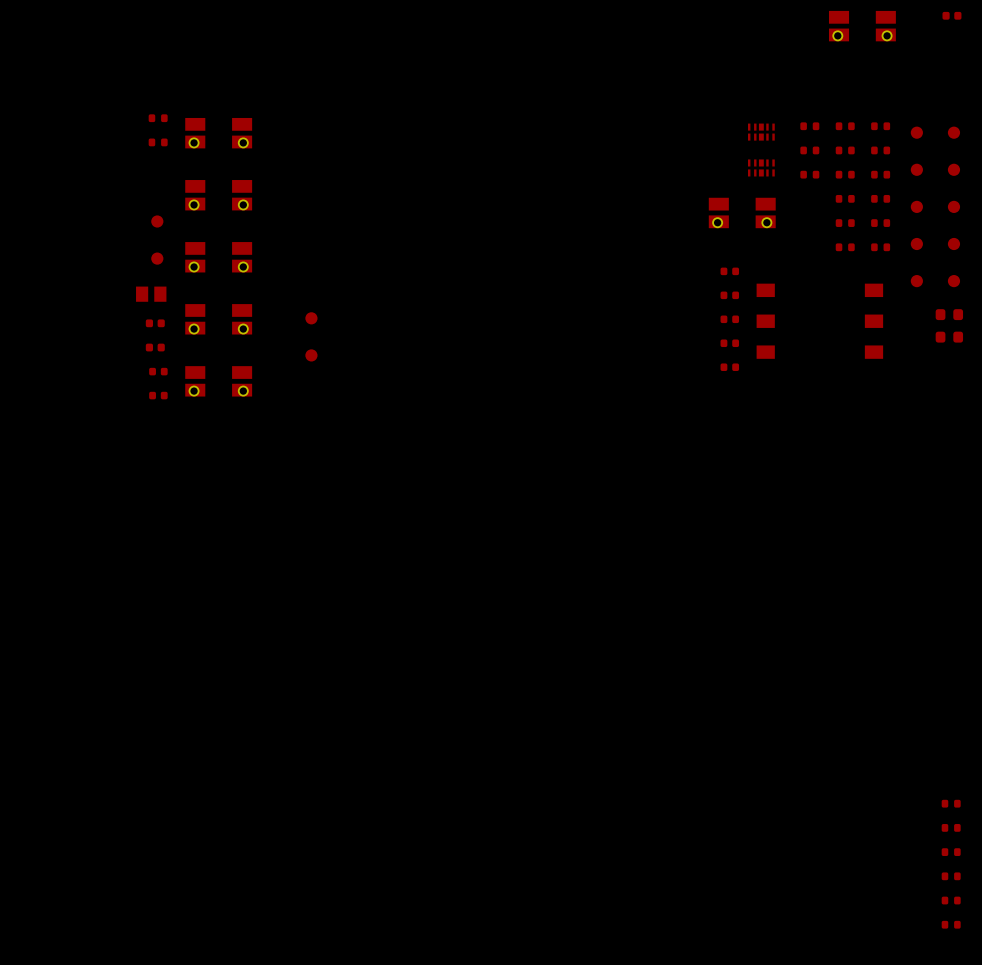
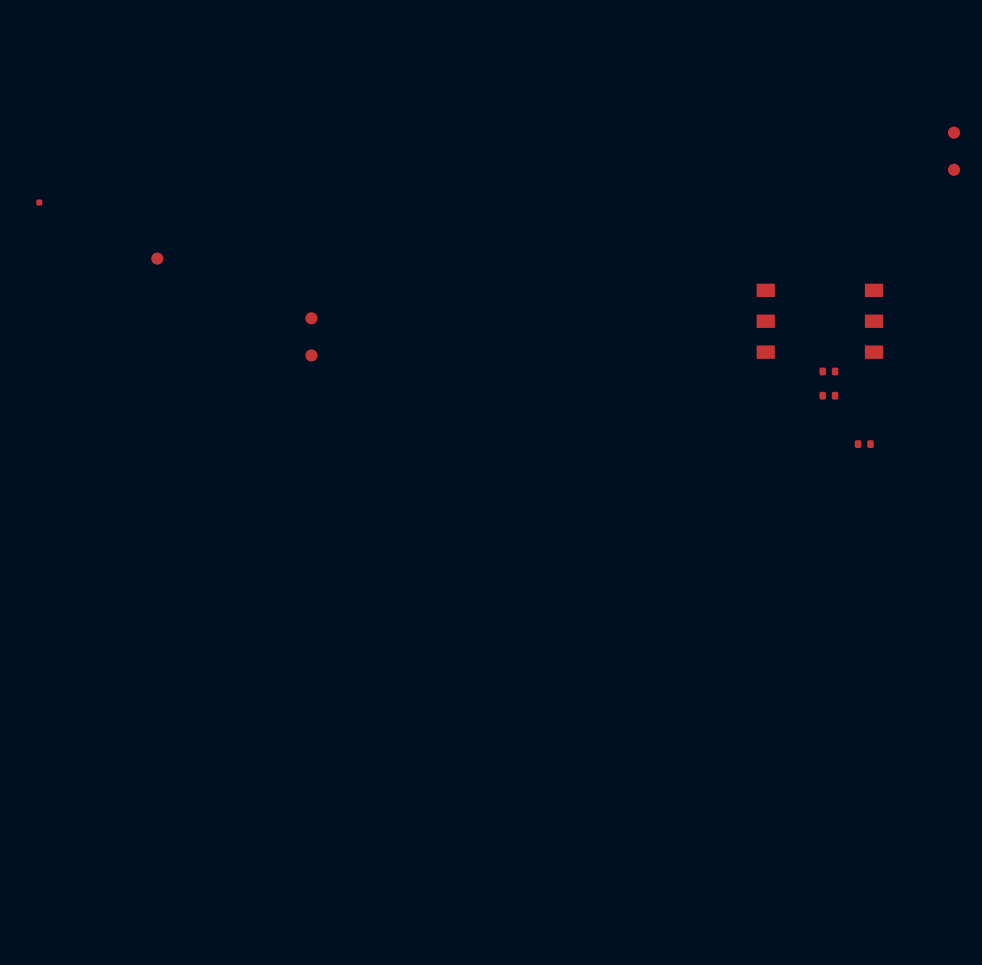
part: (951, 15) -> none
part: (862, 26) -> none
part: (158, 118) -> none
part: (809, 126) -> none
part: (845, 126) -> none
part: (880, 126) -> none
part: (761, 132) -> none
part: (916, 132) -> none
part: (218, 133) -> none
part: (158, 142) -> none
part: (809, 150) -> none
part: (845, 150) -> none
part: (880, 150) -> none
part: (761, 167) -> none
part: (916, 169) -> none
part: (809, 174) -> none
part: (845, 174) -> none
part: (880, 174) -> none
part: (218, 195) -> none
part: (845, 198) -> none
part: (880, 198) -> none
part: none -> (39, 202)
part: (916, 206) -> none
part: (953, 206) -> none
part: (742, 212) -> none
part: (157, 221) -> none
part: (845, 223) -> none
part: (880, 223) -> none
part: (916, 244) -> none
part: (953, 244) -> none
part: (845, 247) -> none
part: (880, 247) -> none
part: (218, 257) -> none
part: (729, 271) -> none
part: (916, 281) -> none
part: (953, 281) -> none
part: (151, 294) -> none
part: (729, 295) -> none
part: (218, 319) -> none
part: (729, 319) -> none
part: (155, 323) -> none
part: (949, 325) -> none
part: (729, 343) -> none
part: (155, 347) -> none
part: (729, 367) -> none
part: (158, 371) -> none
part: none -> (828, 371)
part: (218, 381) -> none
part: (158, 395) -> none
part: none -> (828, 395)
part: none -> (864, 444)
part: (951, 803) -> none
part: (951, 827) -> none
part: (951, 852) -> none
part: (951, 876) -> none
part: (951, 900) -> none
part: (951, 924) -> none

